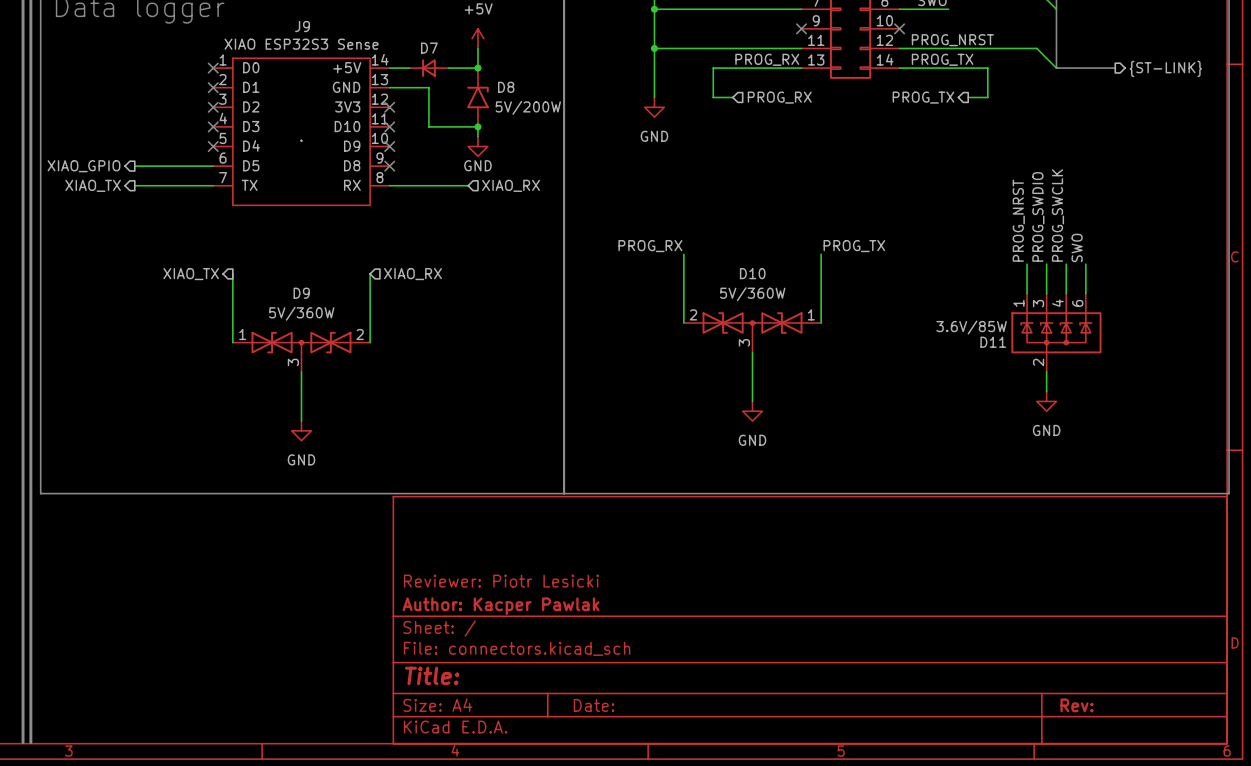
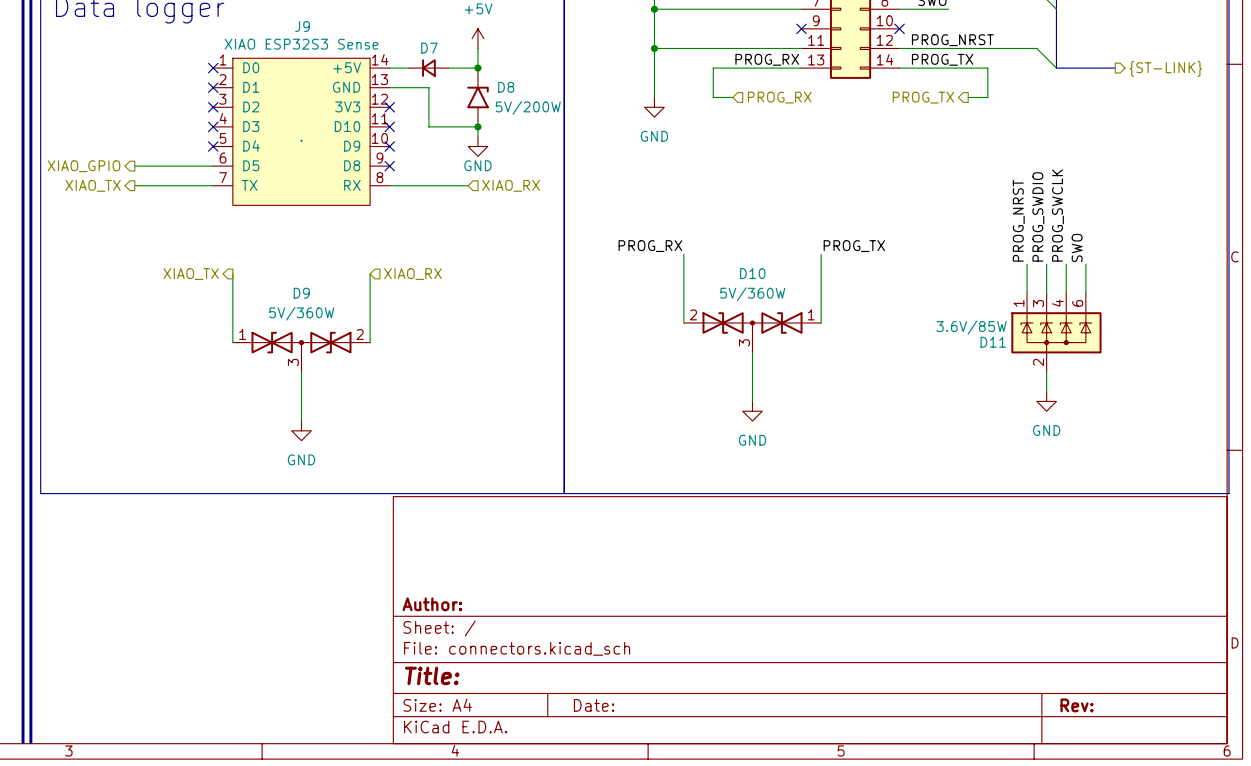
title block: Reviewer: Piotr Lesicki (501, 581) -> none
title block: Author: Kacper Pawlak (501, 606) -> Author: (432, 604)

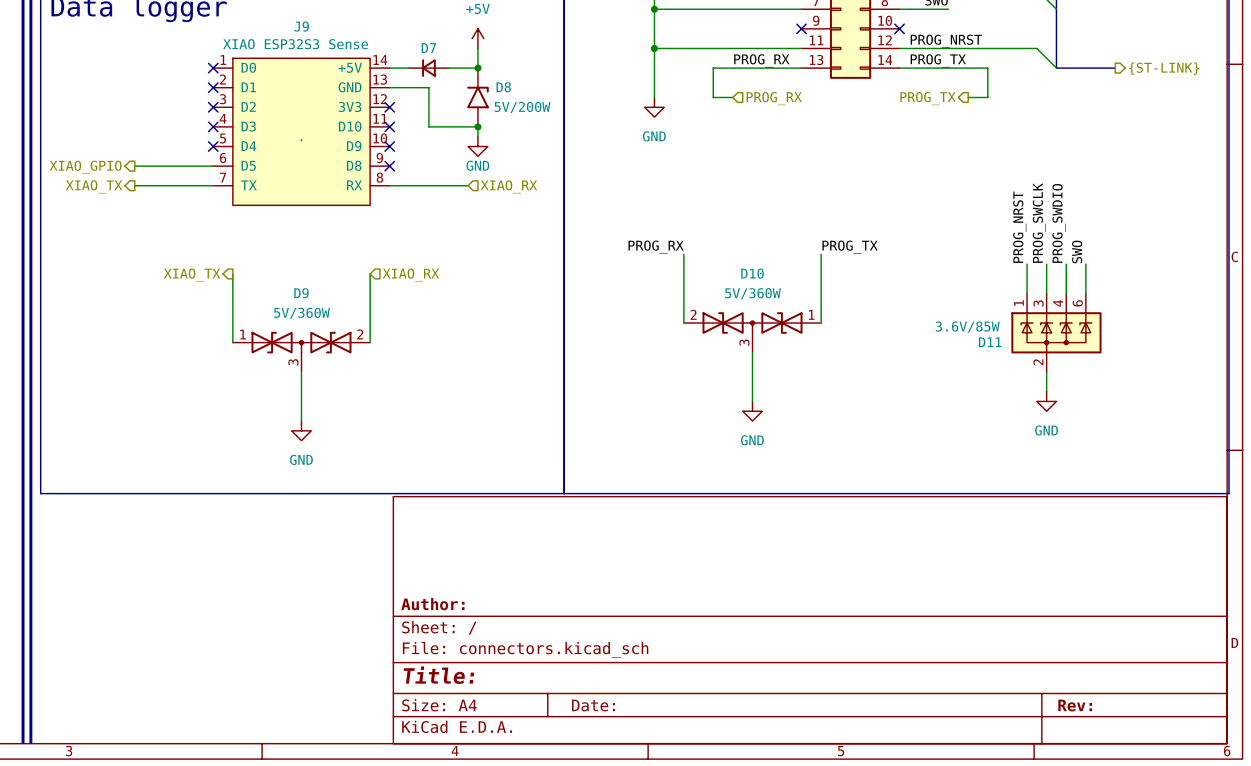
label: PROG_SWCLK (1057, 215) -> PROG_SWDIO (1058, 223)
label: PROG_SWDIO (1038, 216) -> PROG_SWCLK (1039, 223)

